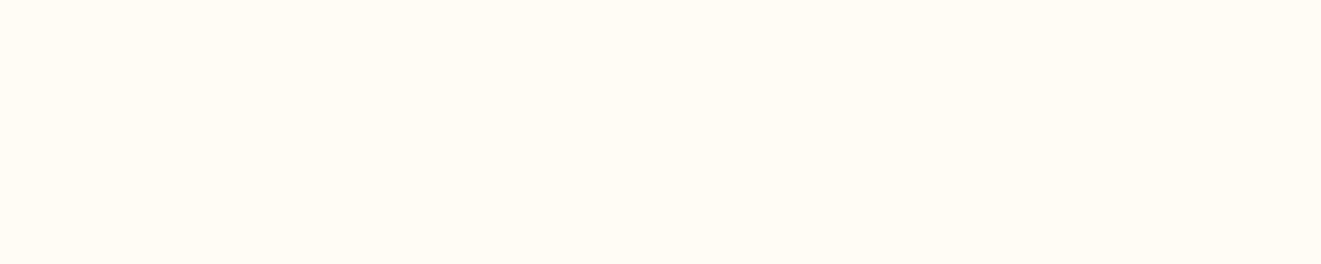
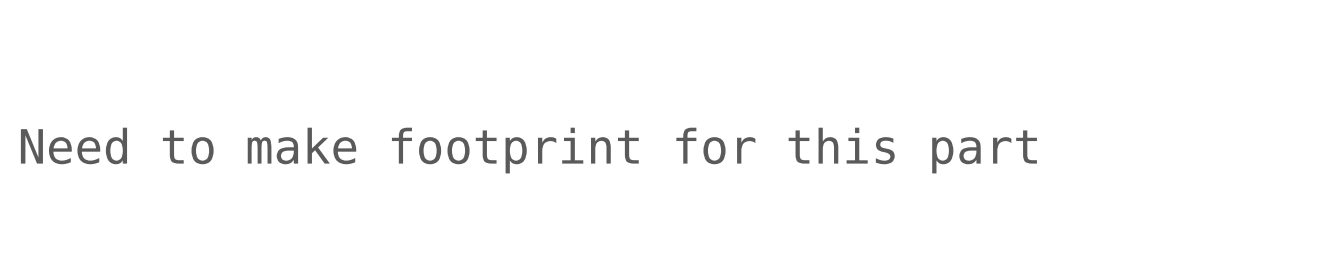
text: none -> Need to make footprint for this part (528, 150)

